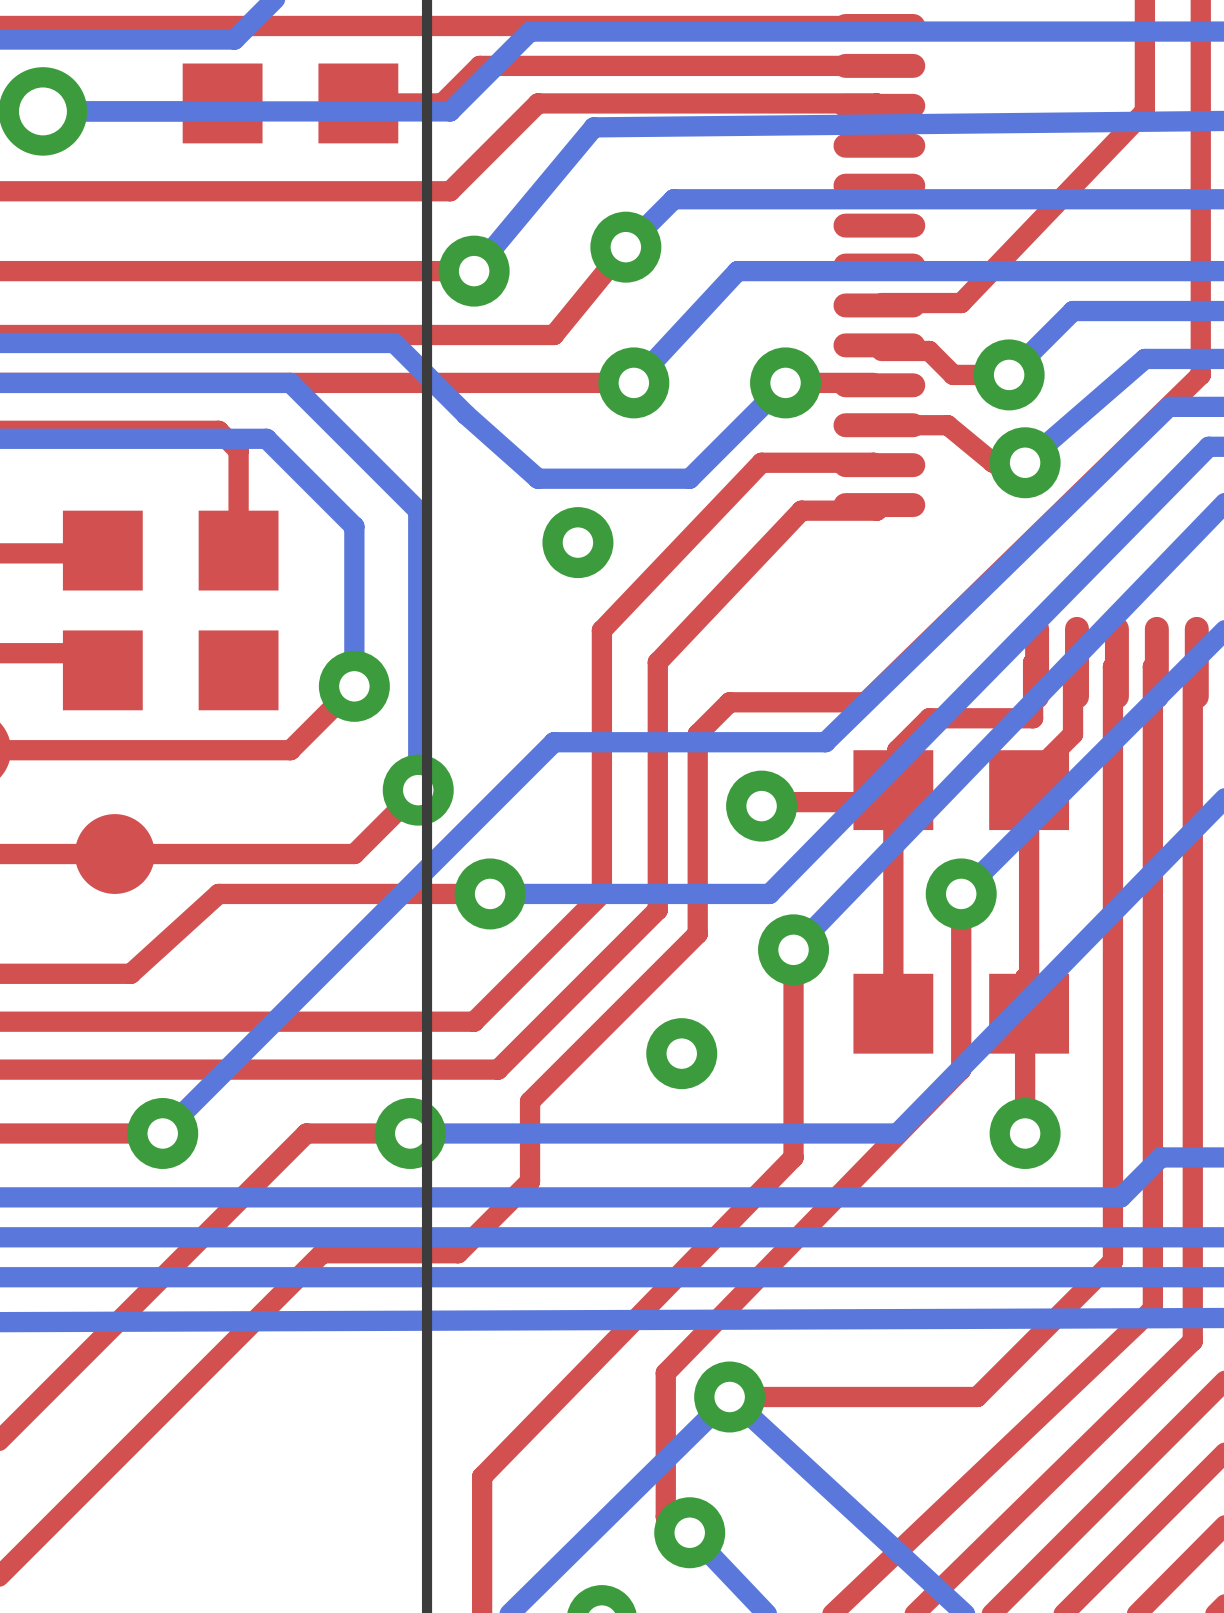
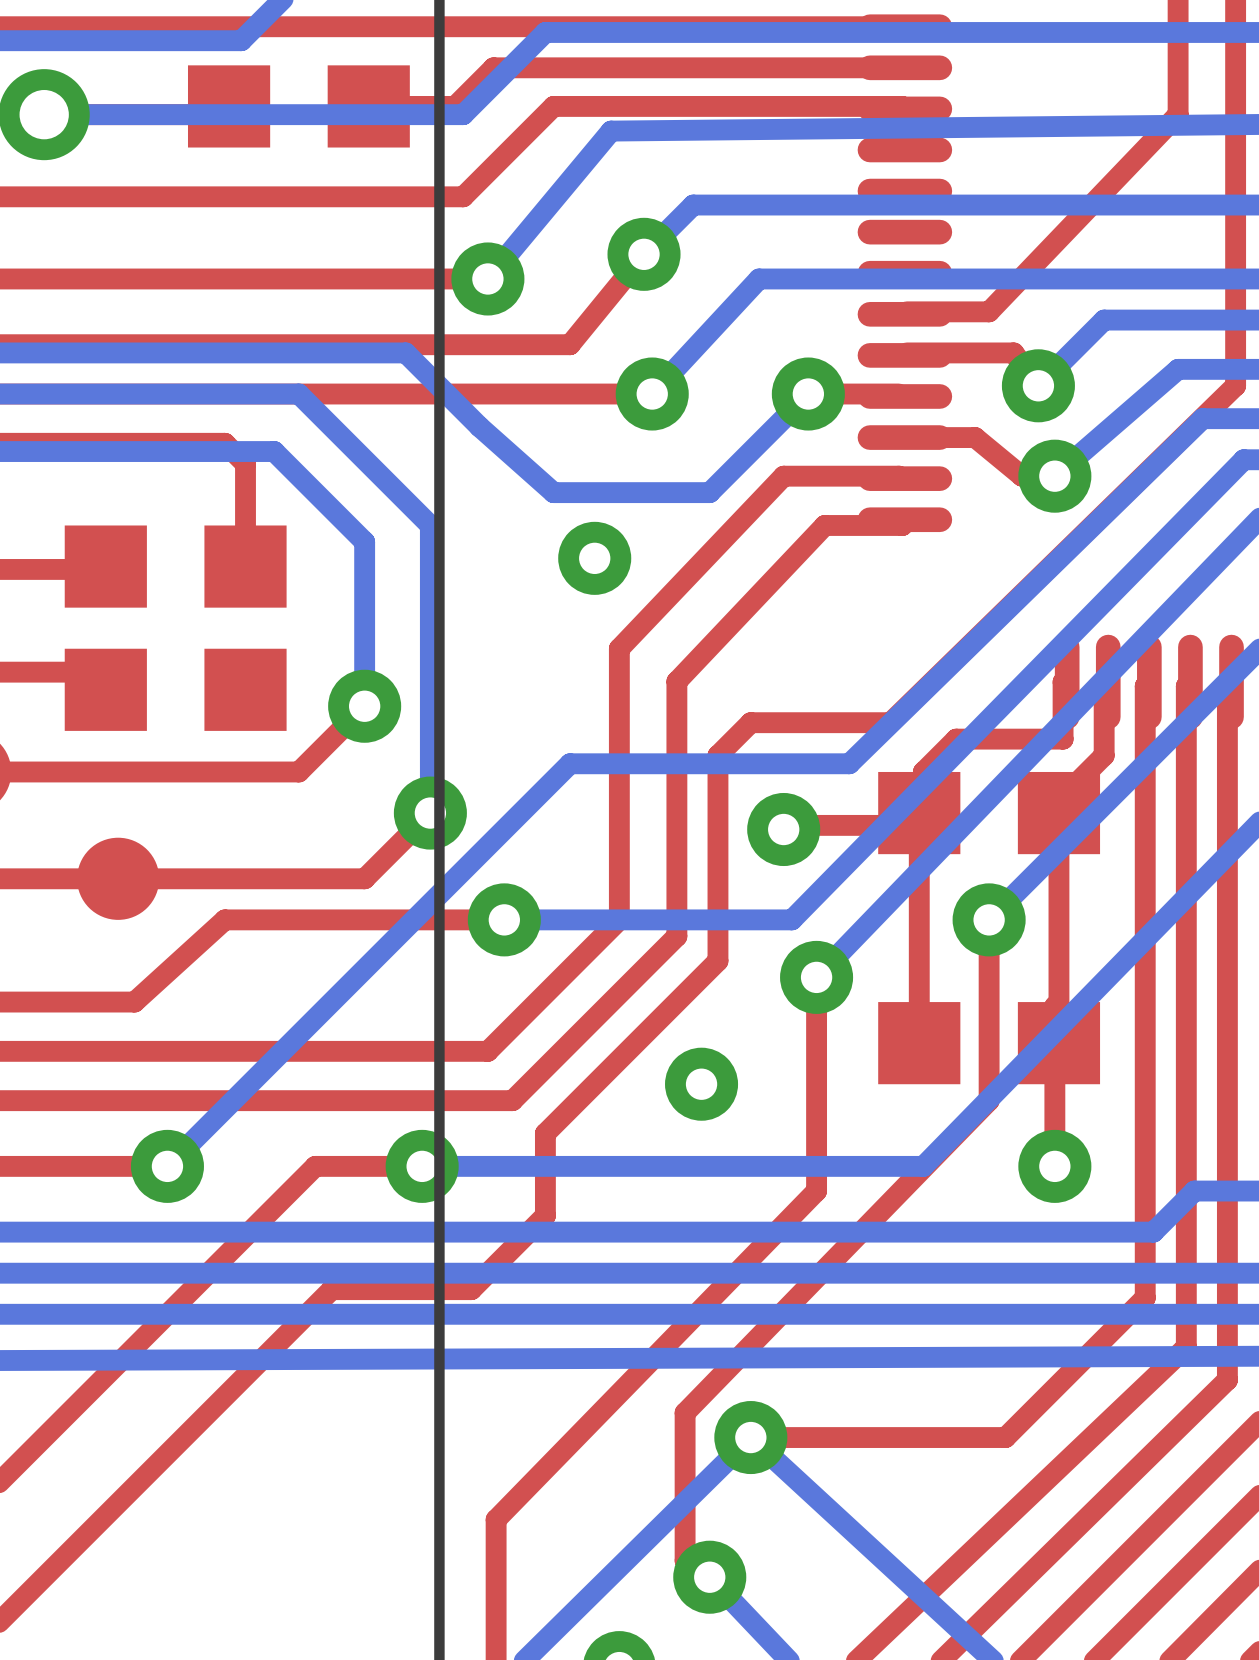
top track: (879, 345) (881, 350) (929, 350) (953, 374) (1009, 374) -> (904, 355) (906, 352) (1013, 352) (1038, 385)

